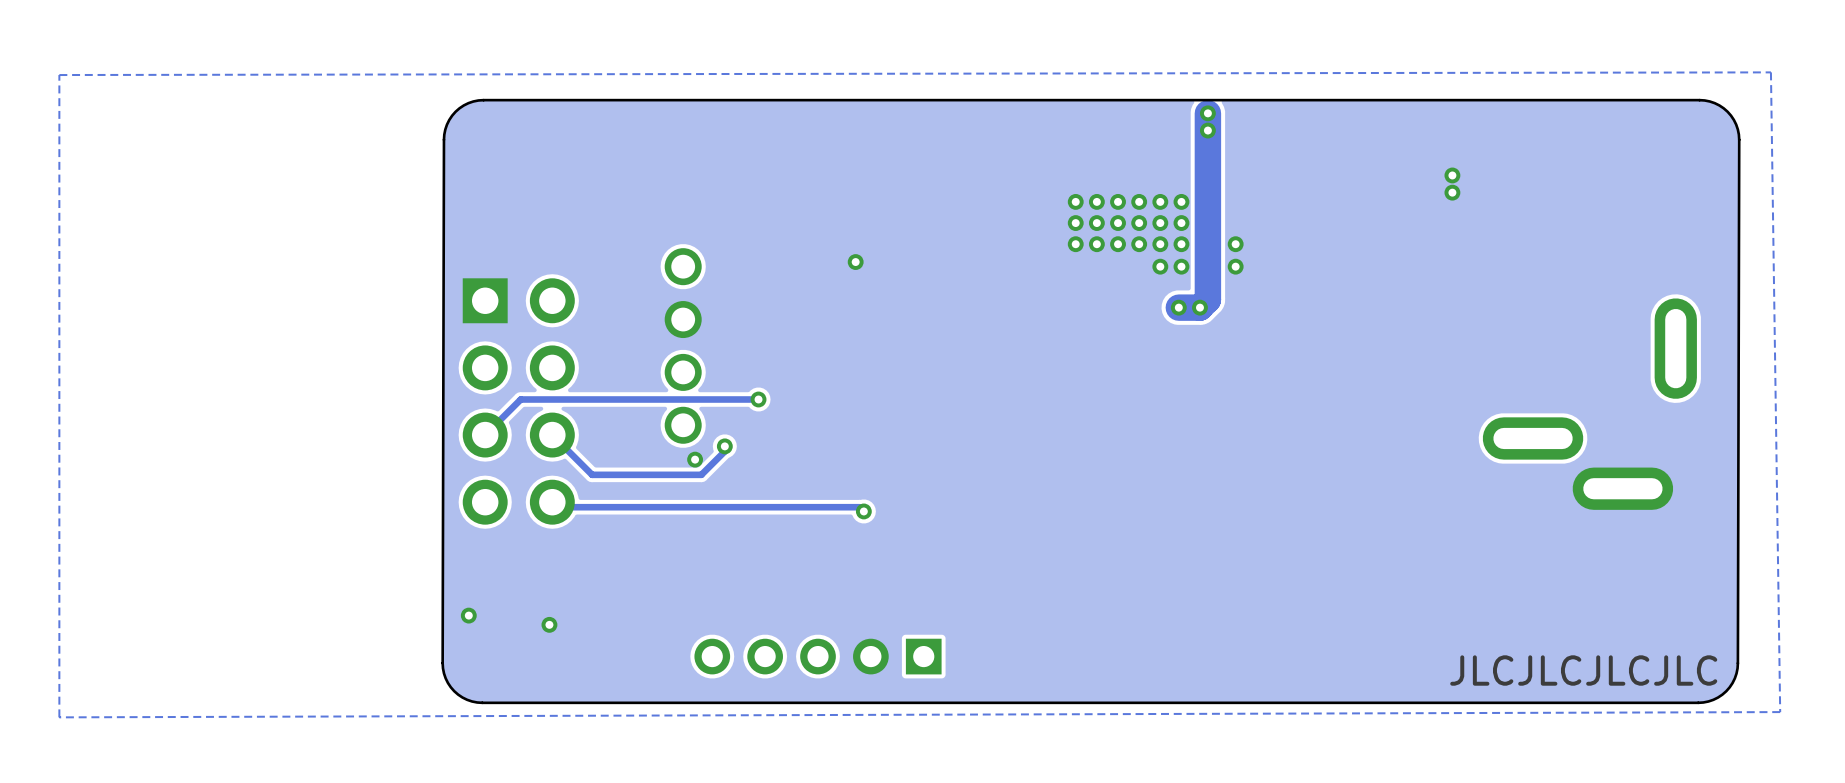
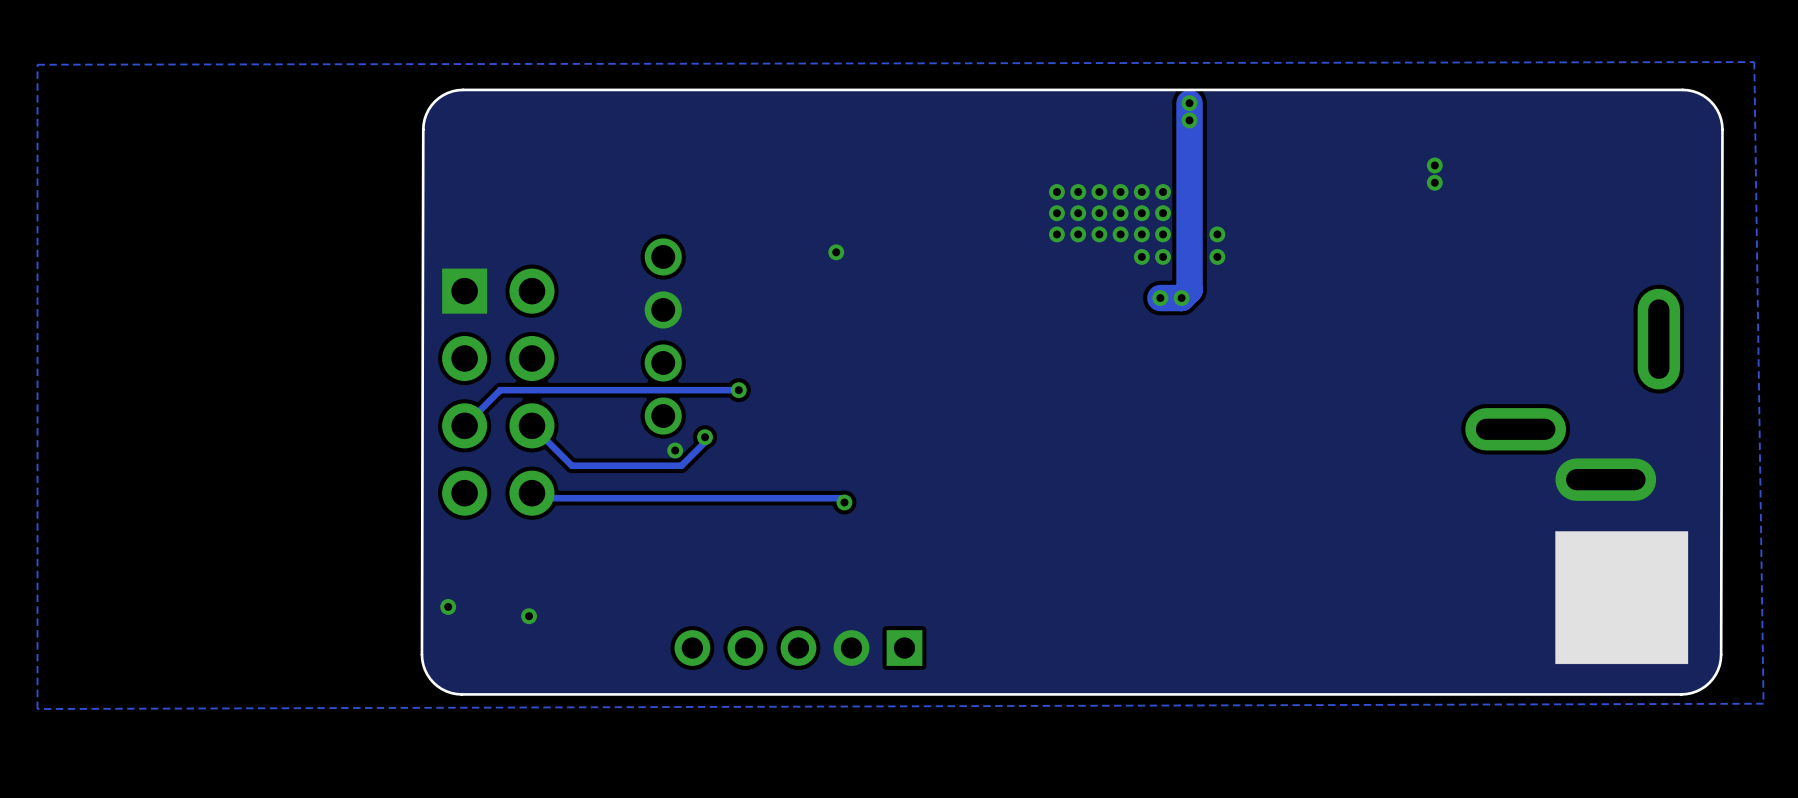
drawing: none -> [1555, 531, 1689, 665]
text: JLCJLCJLCJLC (1583, 670) -> none

